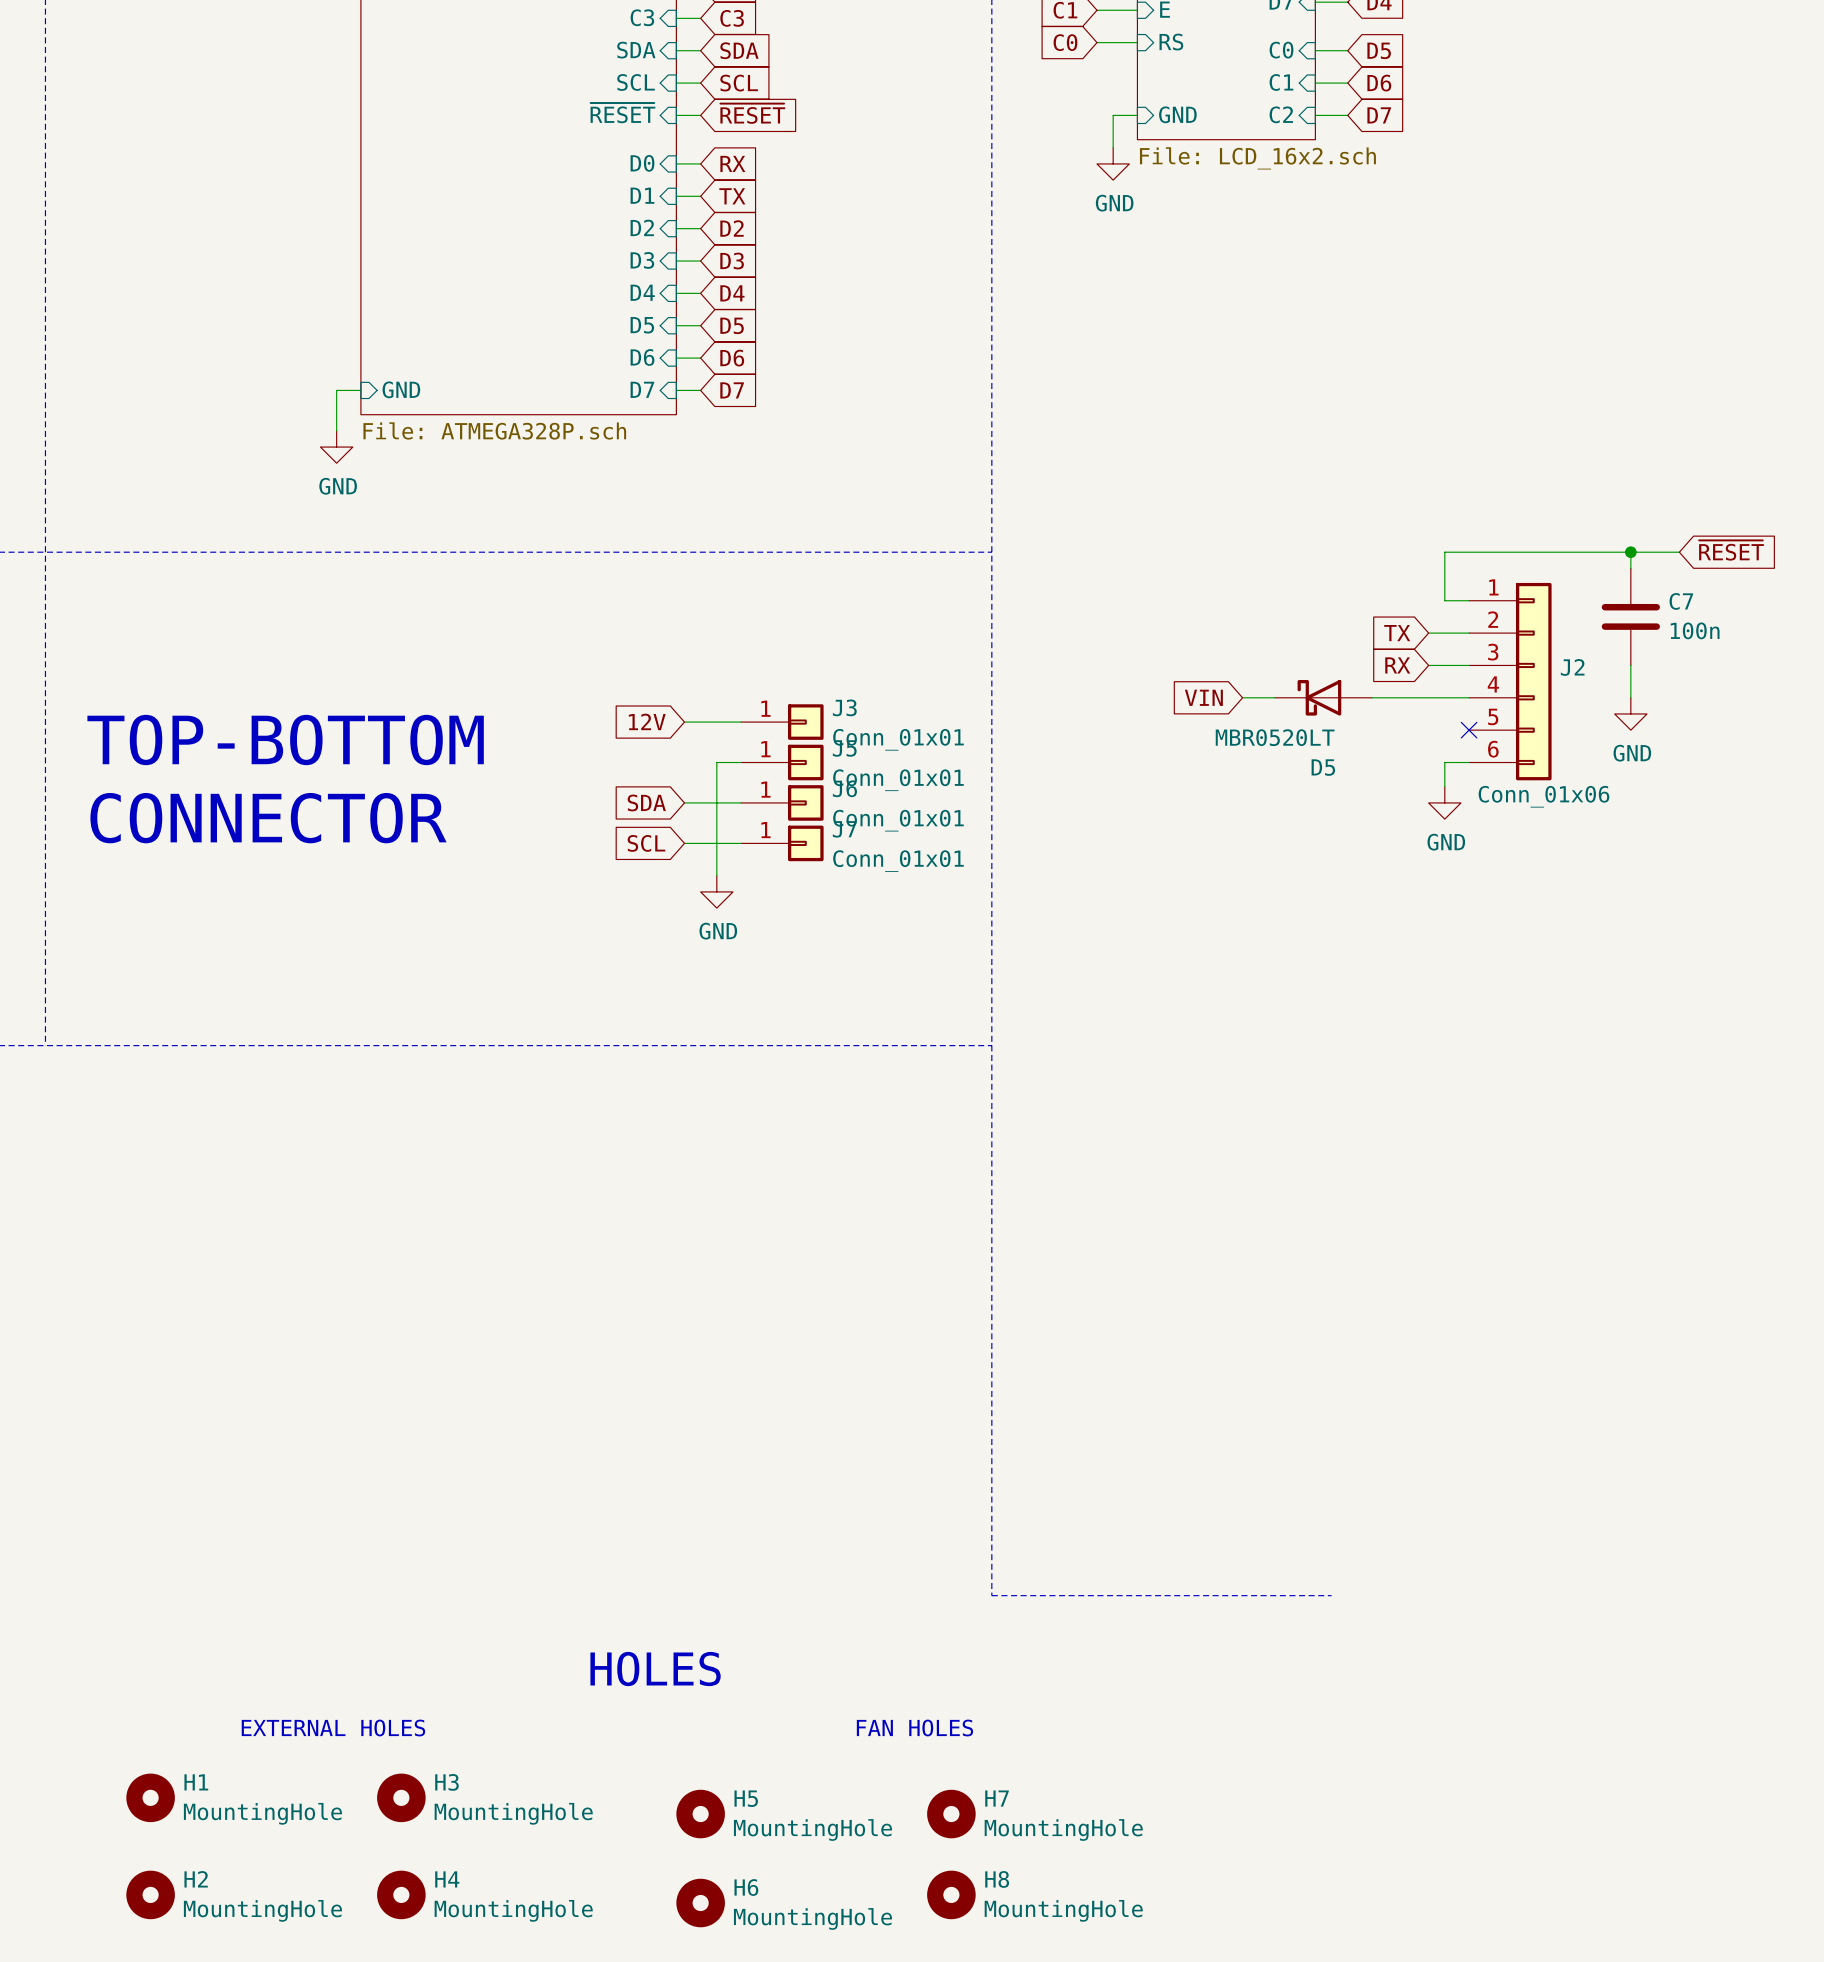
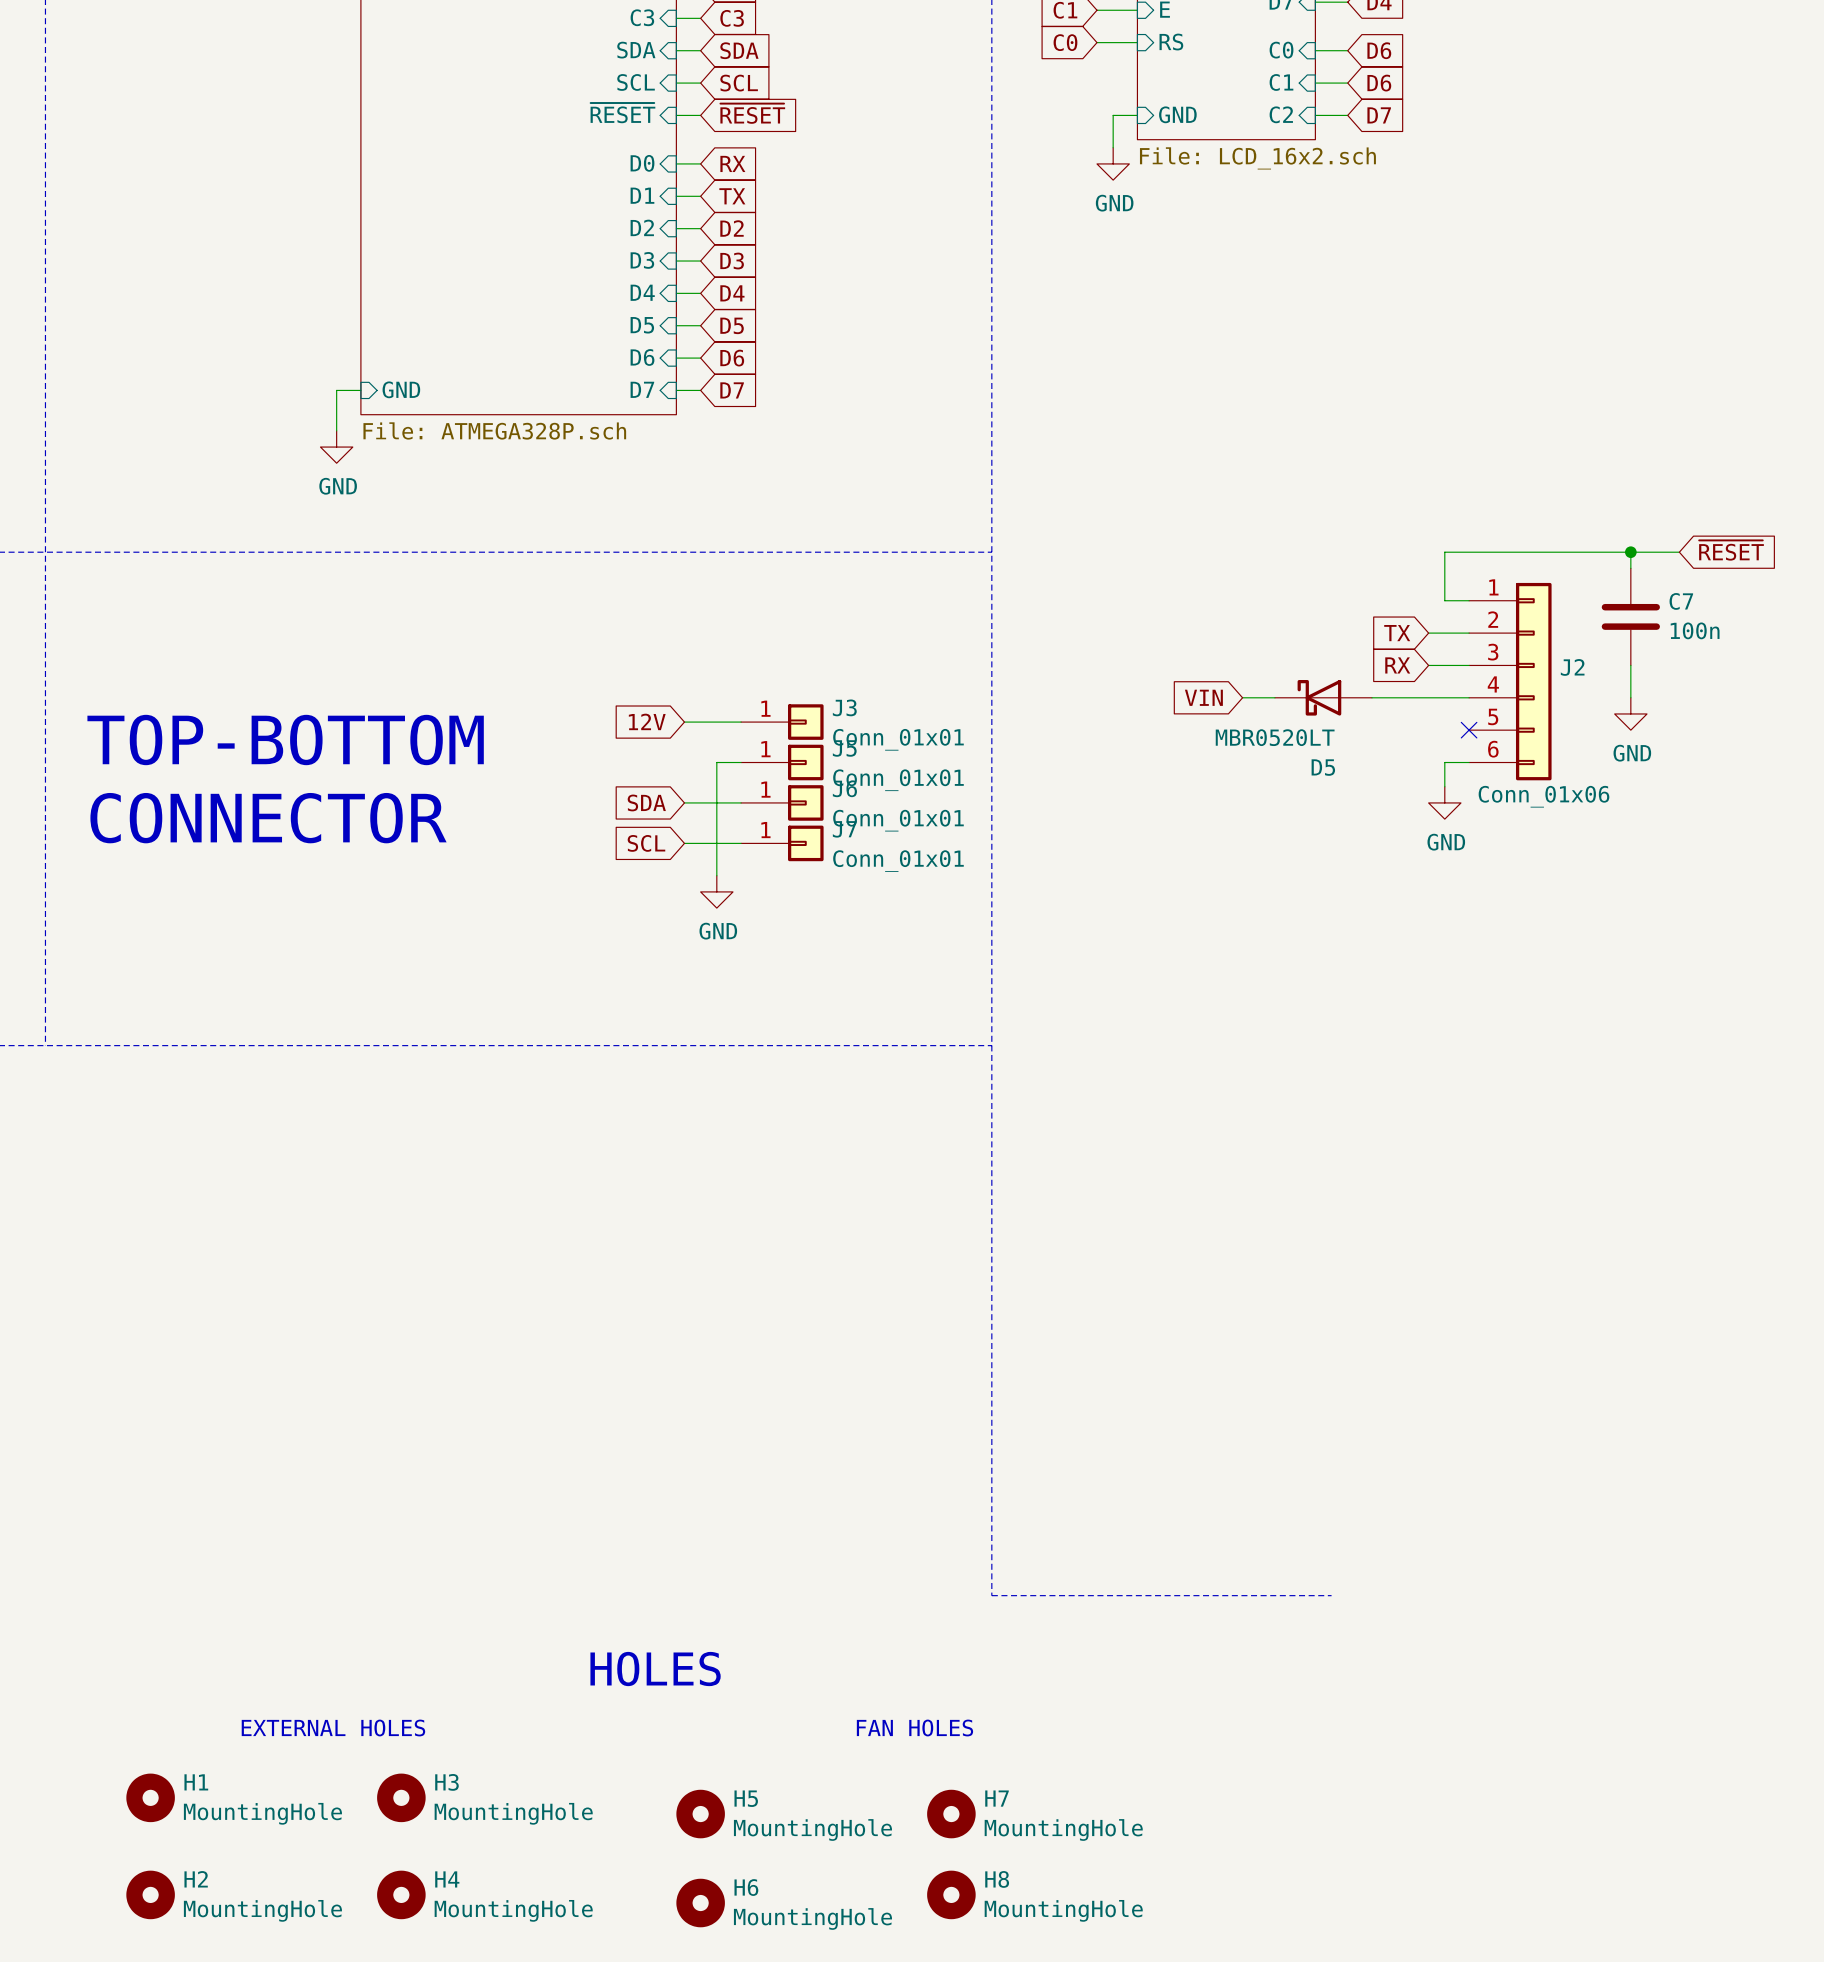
global label: D5 (1379, 50) -> D6 (1379, 50)

